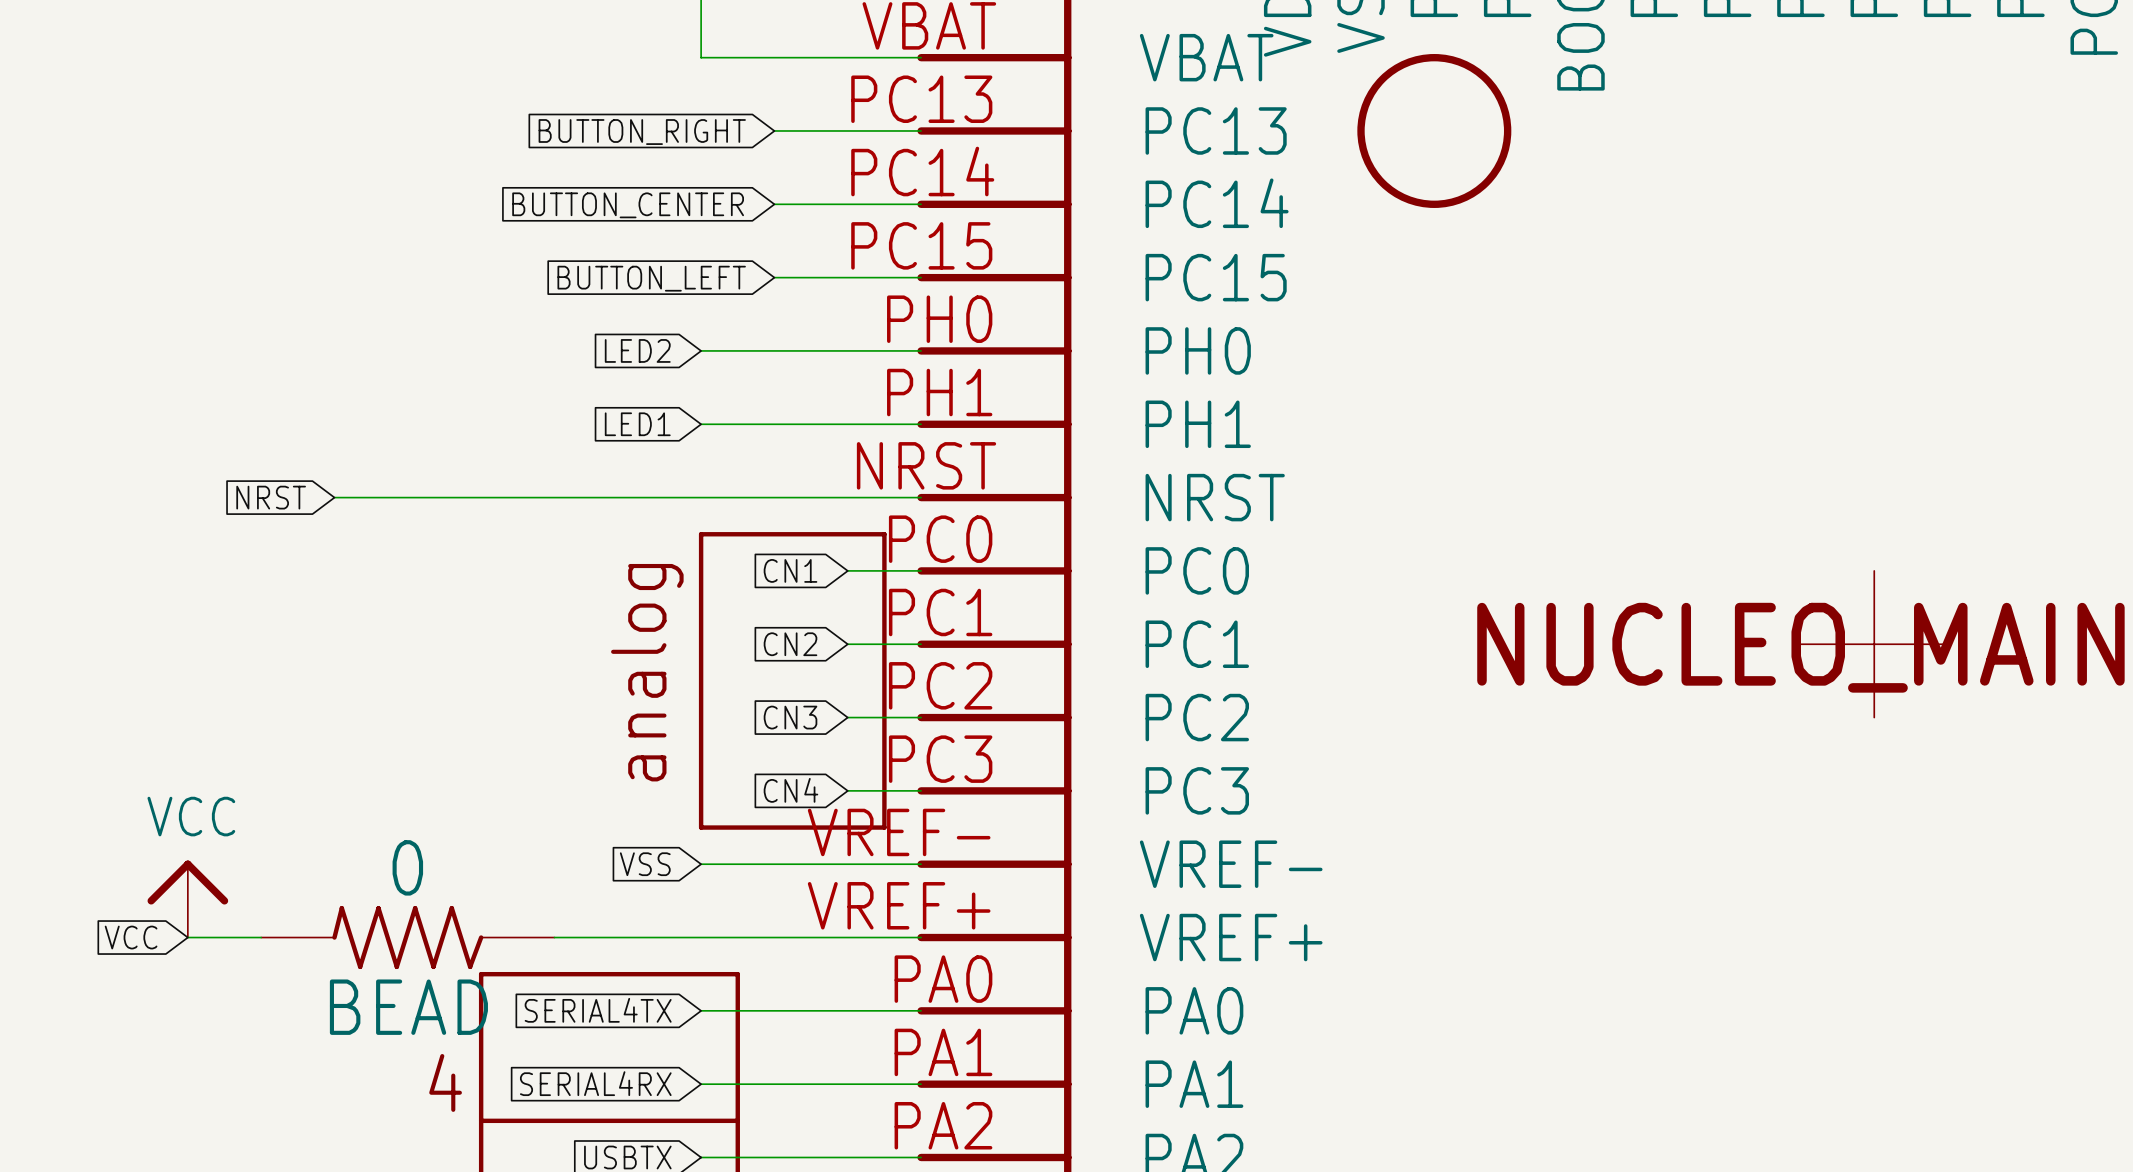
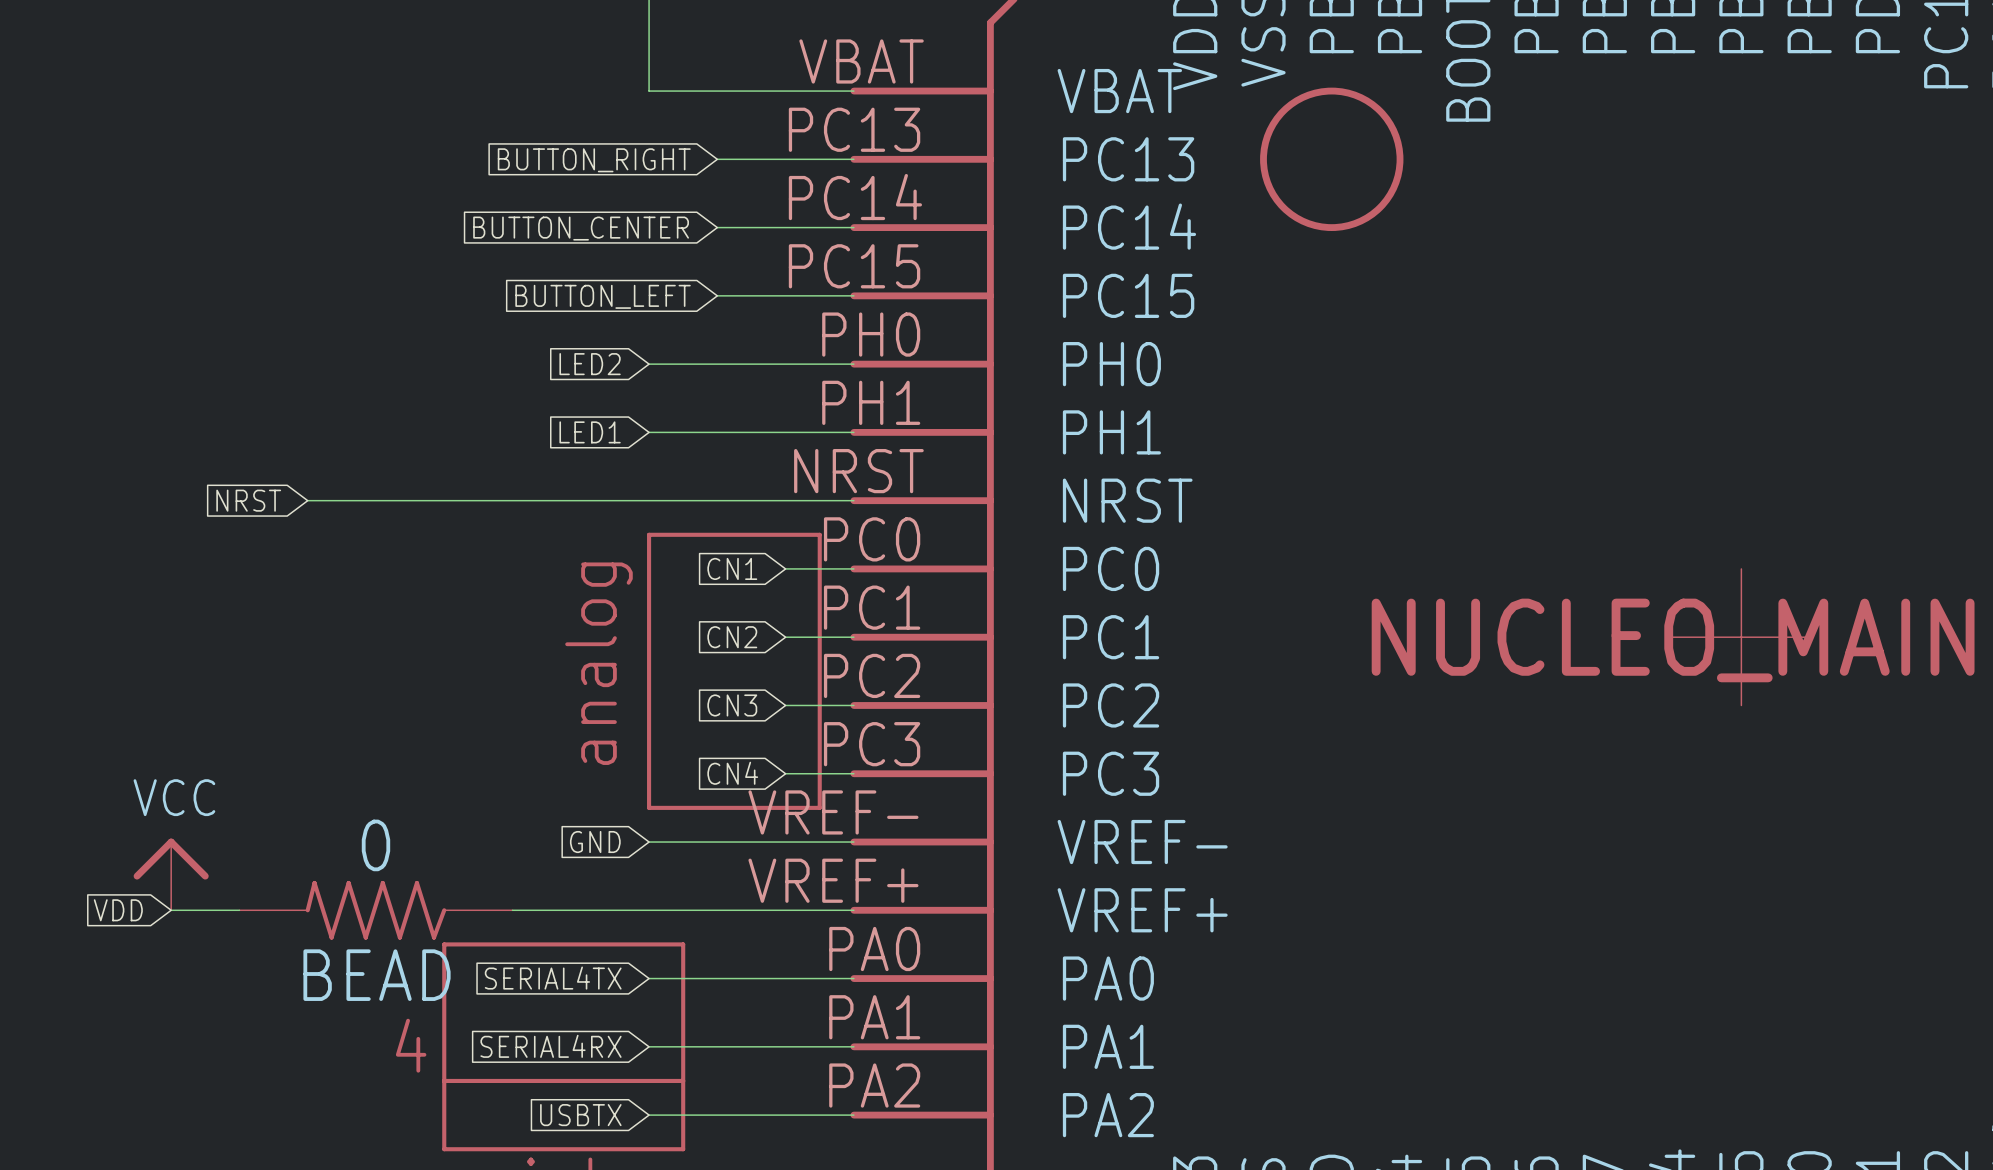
global label: VSS (645, 864) -> GND (595, 842)
global label: VCC (131, 937) -> VDD (118, 910)

